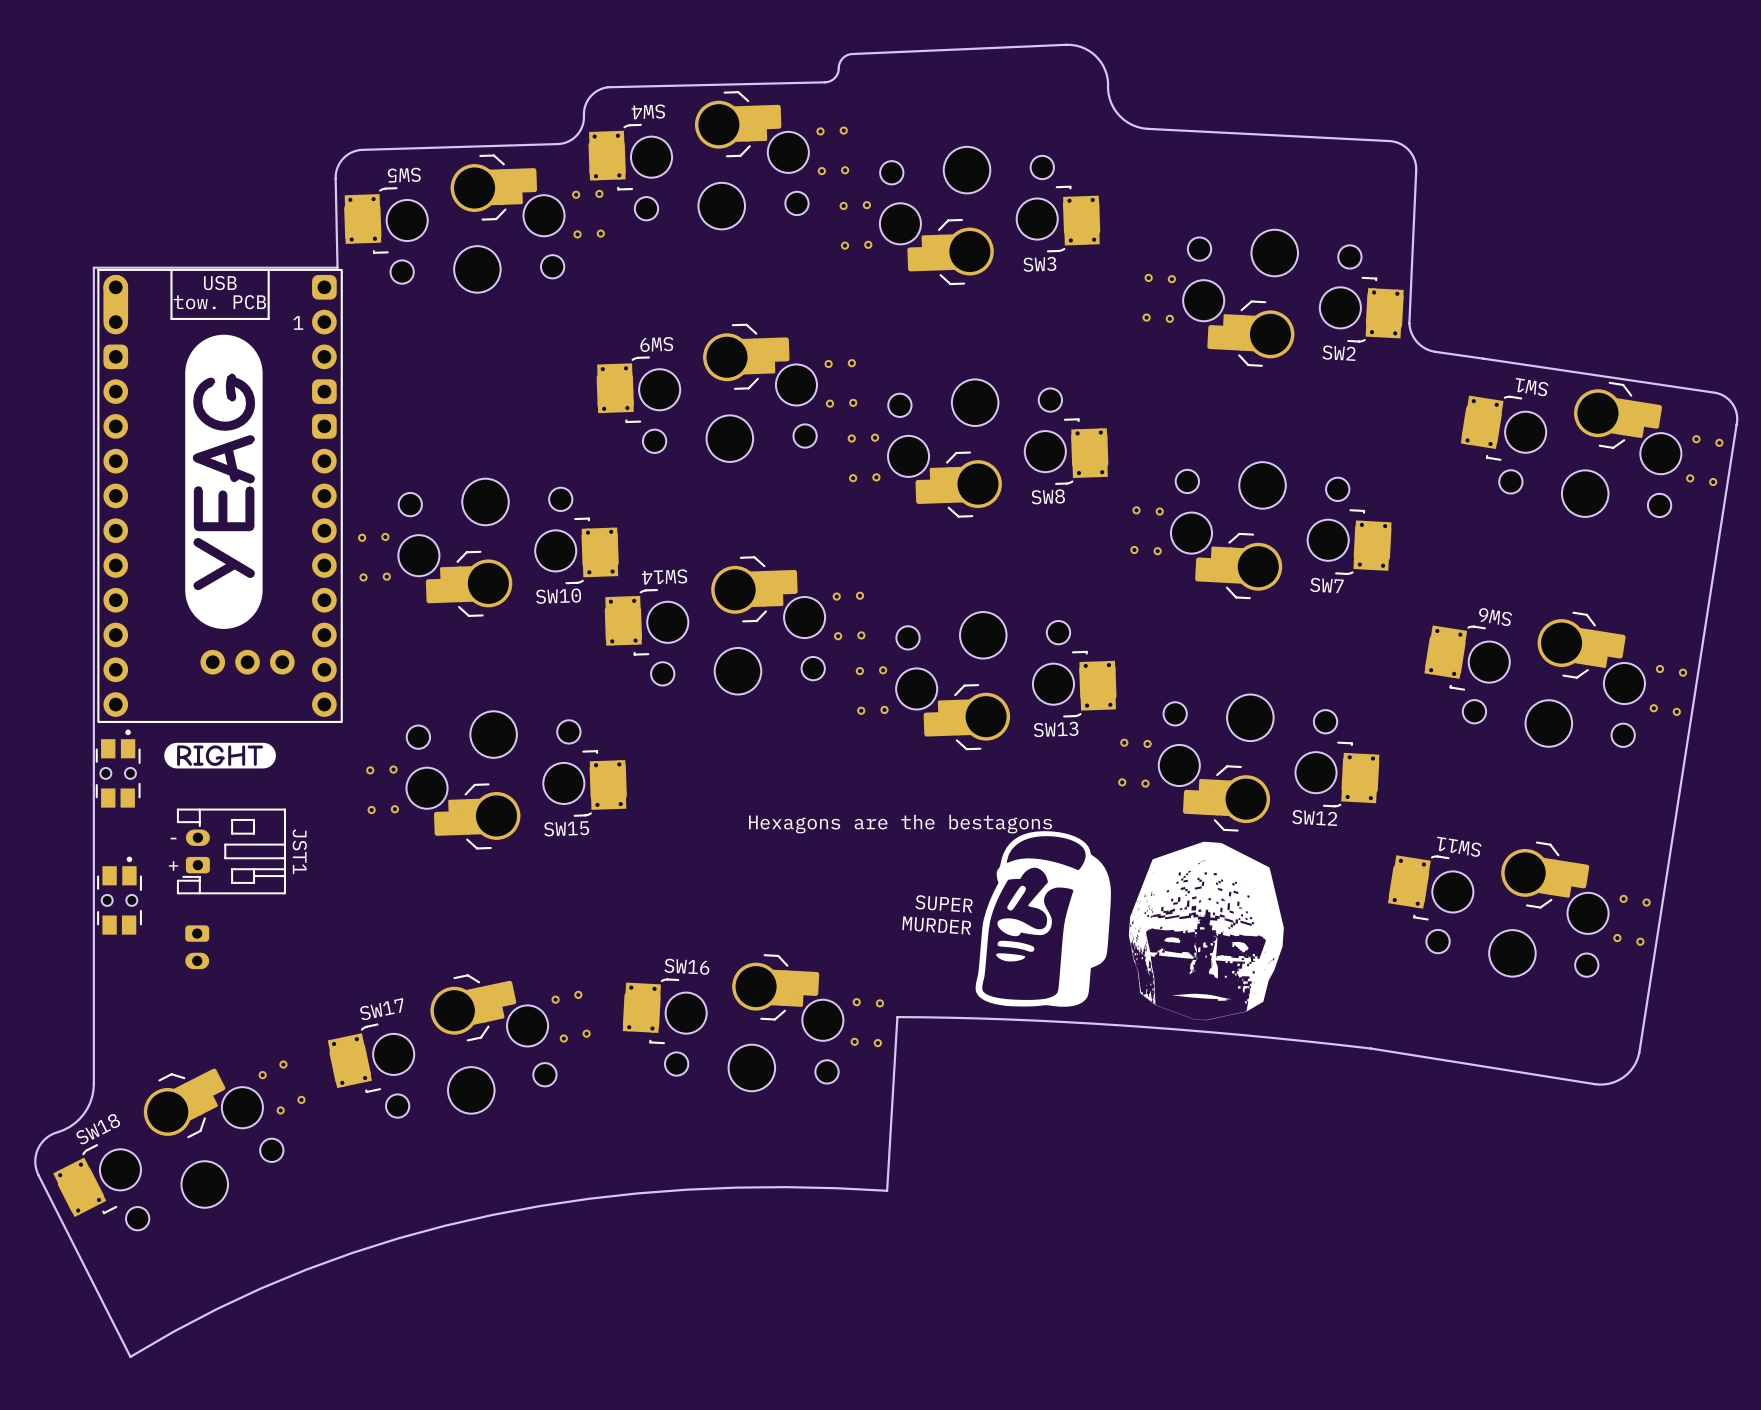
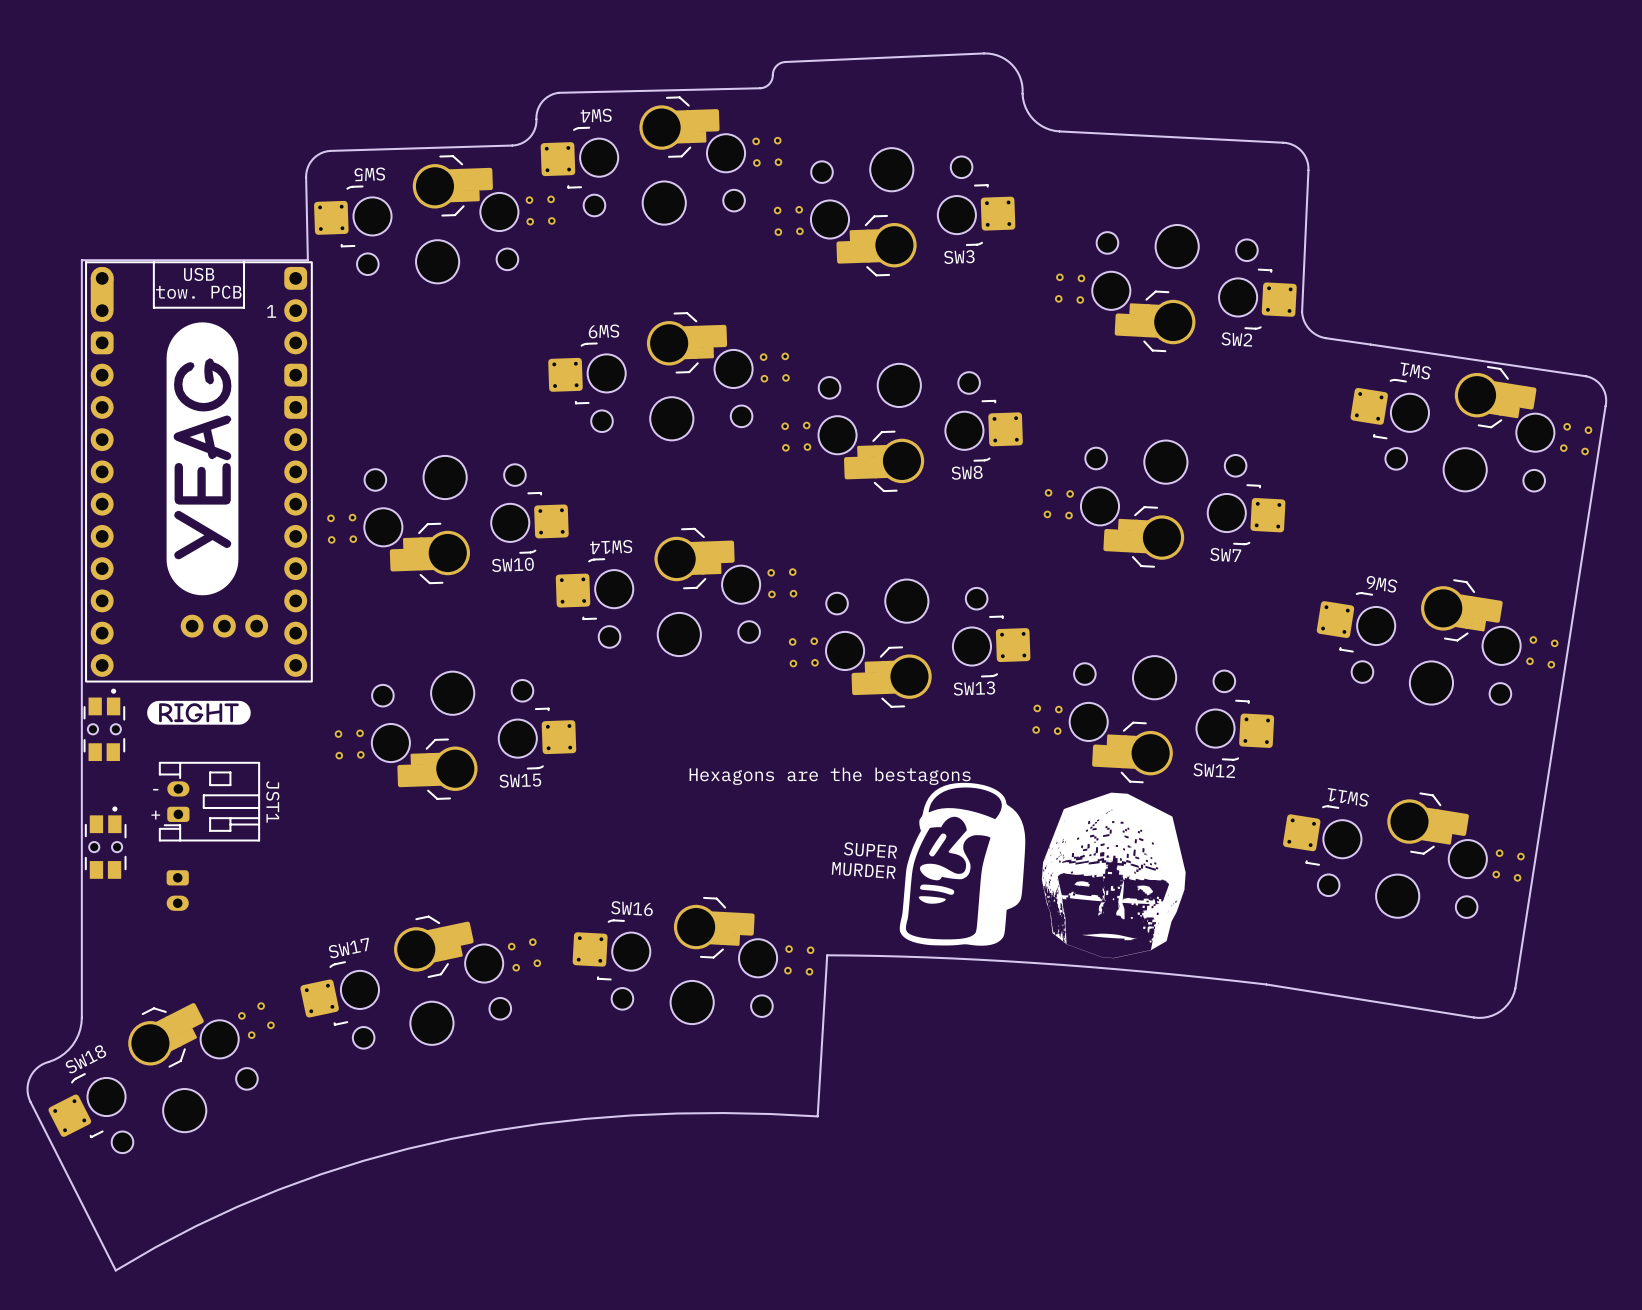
SW4 footprint: [588, 91, 850, 230] -> [540, 96, 783, 225]
SW3 footprint: [839, 146, 1101, 286] -> [773, 148, 1016, 277]
SW5 footprint: [344, 154, 605, 293] -> [314, 155, 556, 284]
SW2 footprint: [1142, 229, 1404, 367] -> [1054, 224, 1297, 353]
SW9 footprint: [596, 323, 858, 462] -> [548, 312, 790, 441]
SW8 footprint: [847, 379, 1109, 518] -> [781, 363, 1023, 493]
SW1 footprint: [1460, 381, 1724, 518] -> [1350, 366, 1593, 492]
SW7 footprint: [1130, 462, 1392, 600] -> [1043, 440, 1286, 568]
SW10 footprint: [358, 478, 619, 617] -> [327, 455, 569, 585]
SW14 footprint: [604, 556, 866, 695] -> [555, 527, 798, 657]
SW6 footprint: [1424, 611, 1688, 747] -> [1316, 579, 1559, 705]
SW13 footprint: [855, 612, 1117, 751] -> [788, 579, 1031, 708]
SW12 footprint: [1118, 694, 1380, 832] -> [1032, 656, 1275, 784]
SW15 footprint: [366, 711, 627, 850] -> [334, 671, 577, 800]
SW11 footprint: [1388, 841, 1651, 977] -> [1282, 792, 1525, 918]
SW16 footprint: [622, 954, 885, 1092] -> [572, 896, 815, 1025]
SW17 footprint: [327, 974, 591, 1118] -> [300, 915, 542, 1049]
SW18 footprint: [53, 1060, 306, 1231] -> [48, 1002, 275, 1154]

